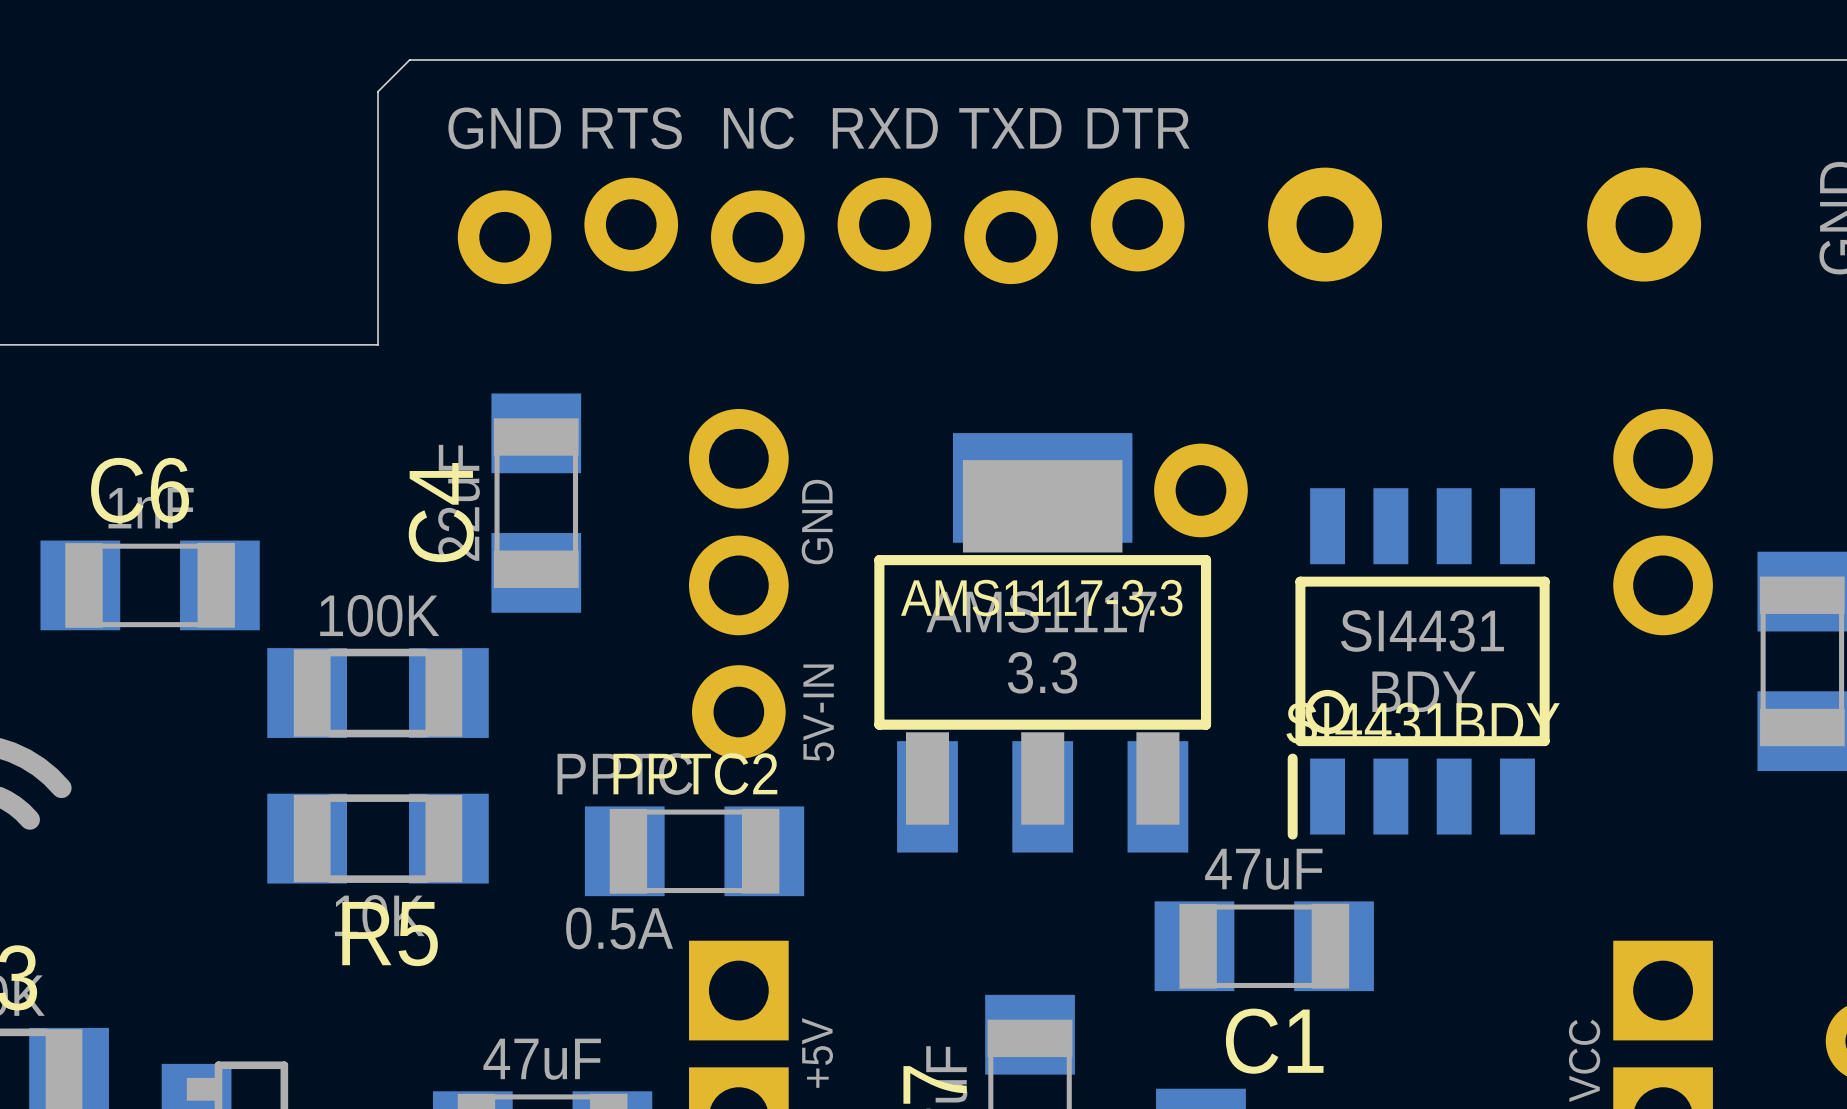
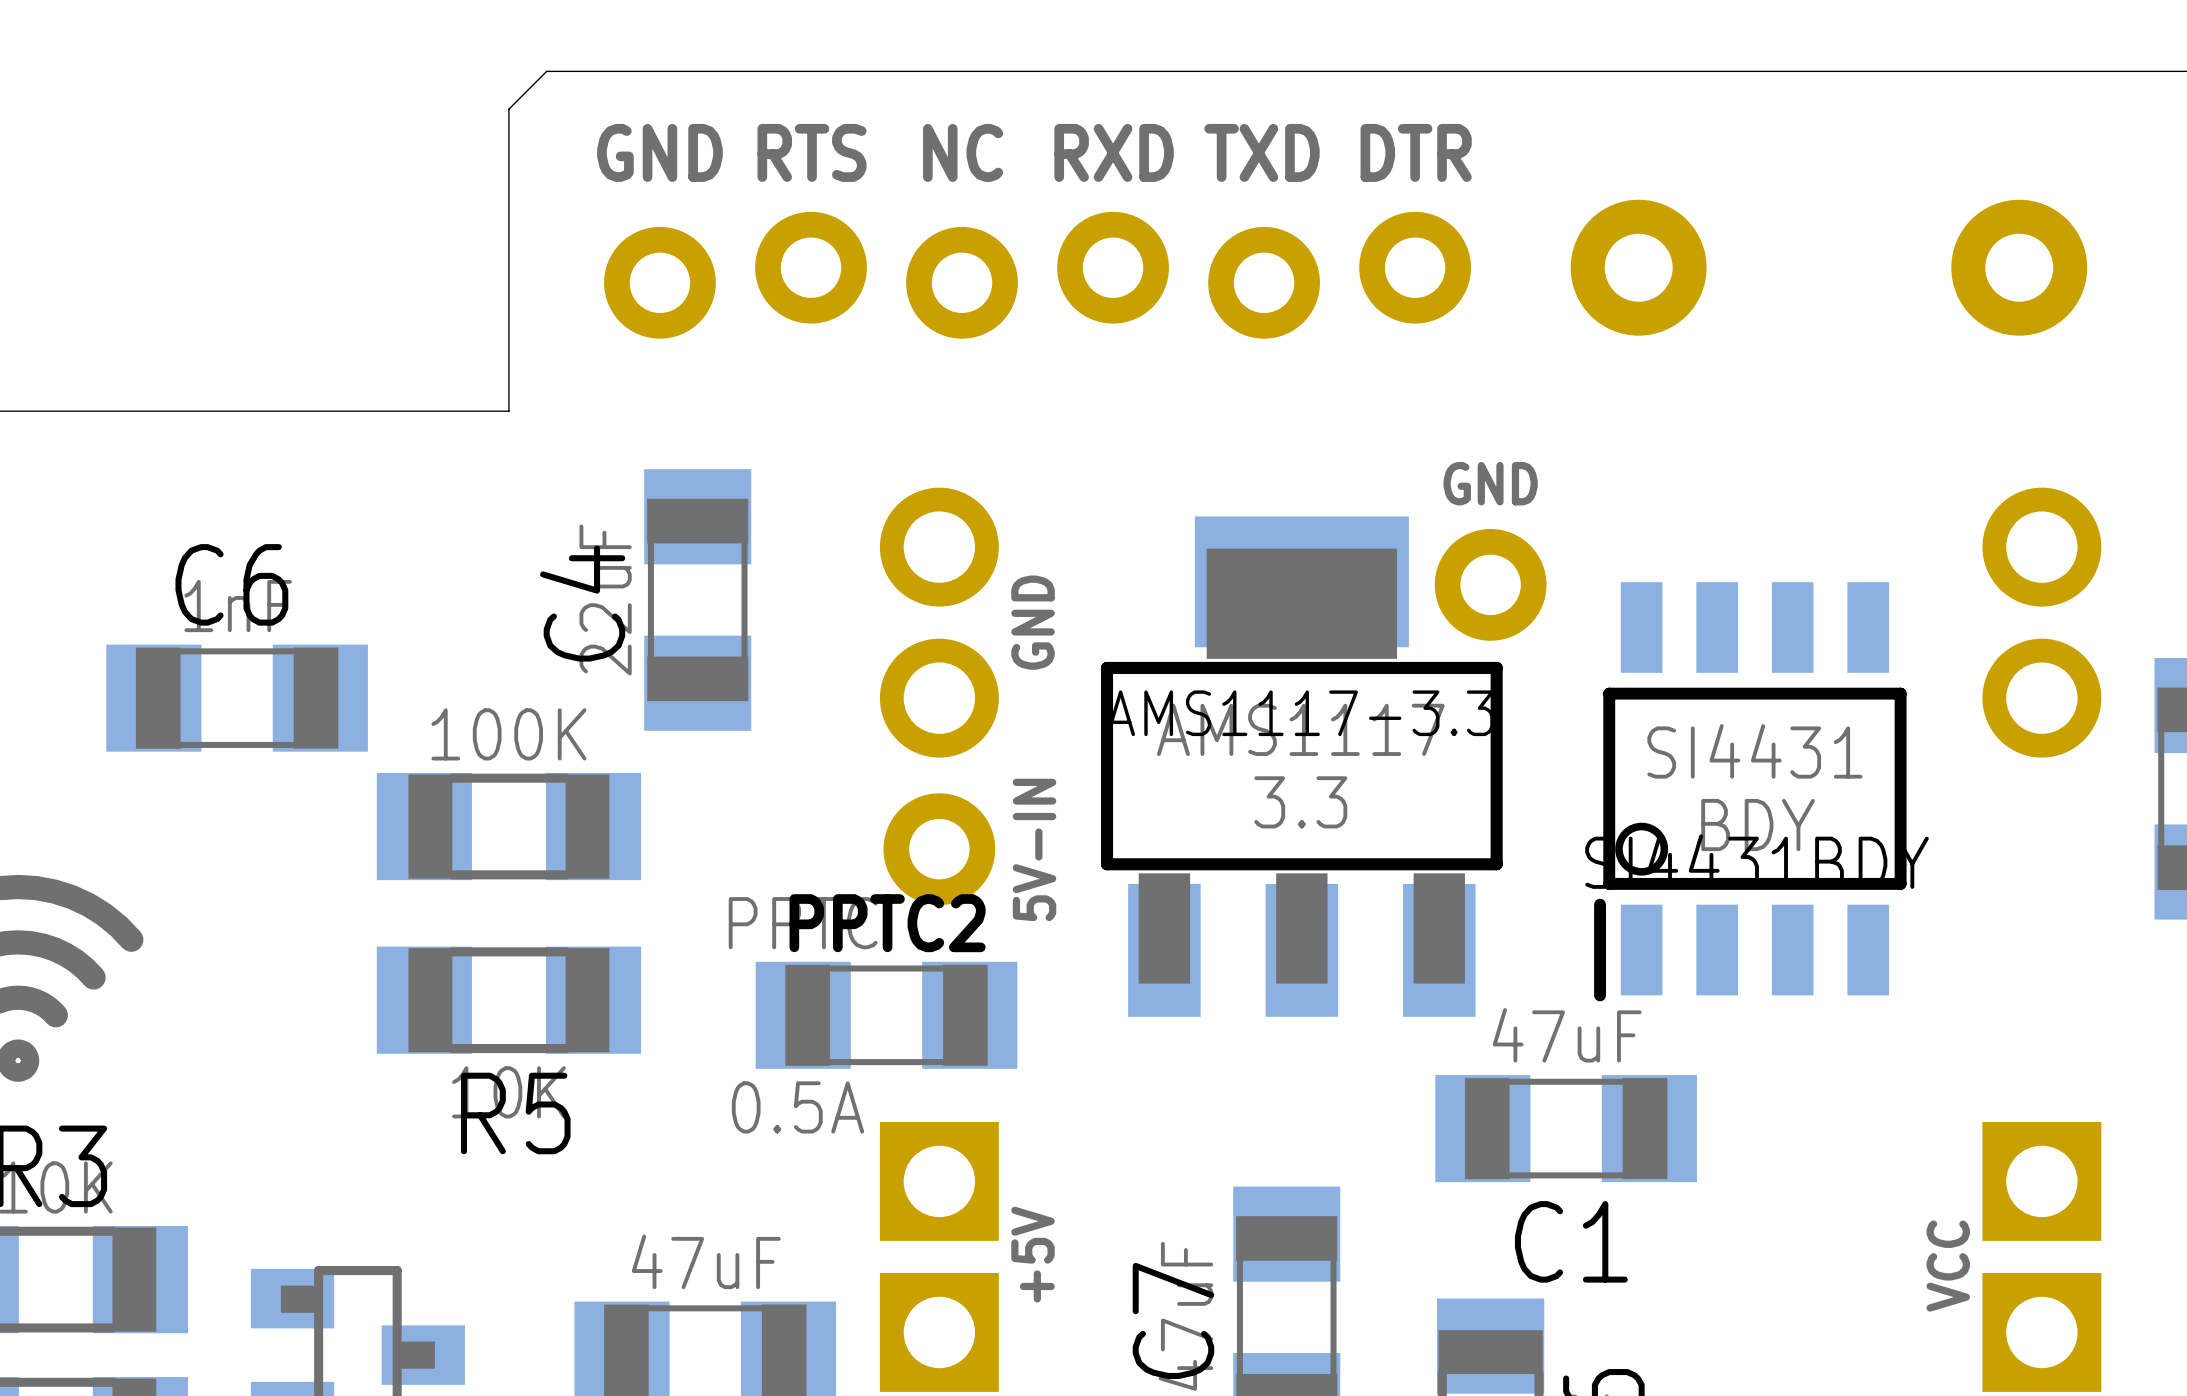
text: none -> GND (1490, 483)

